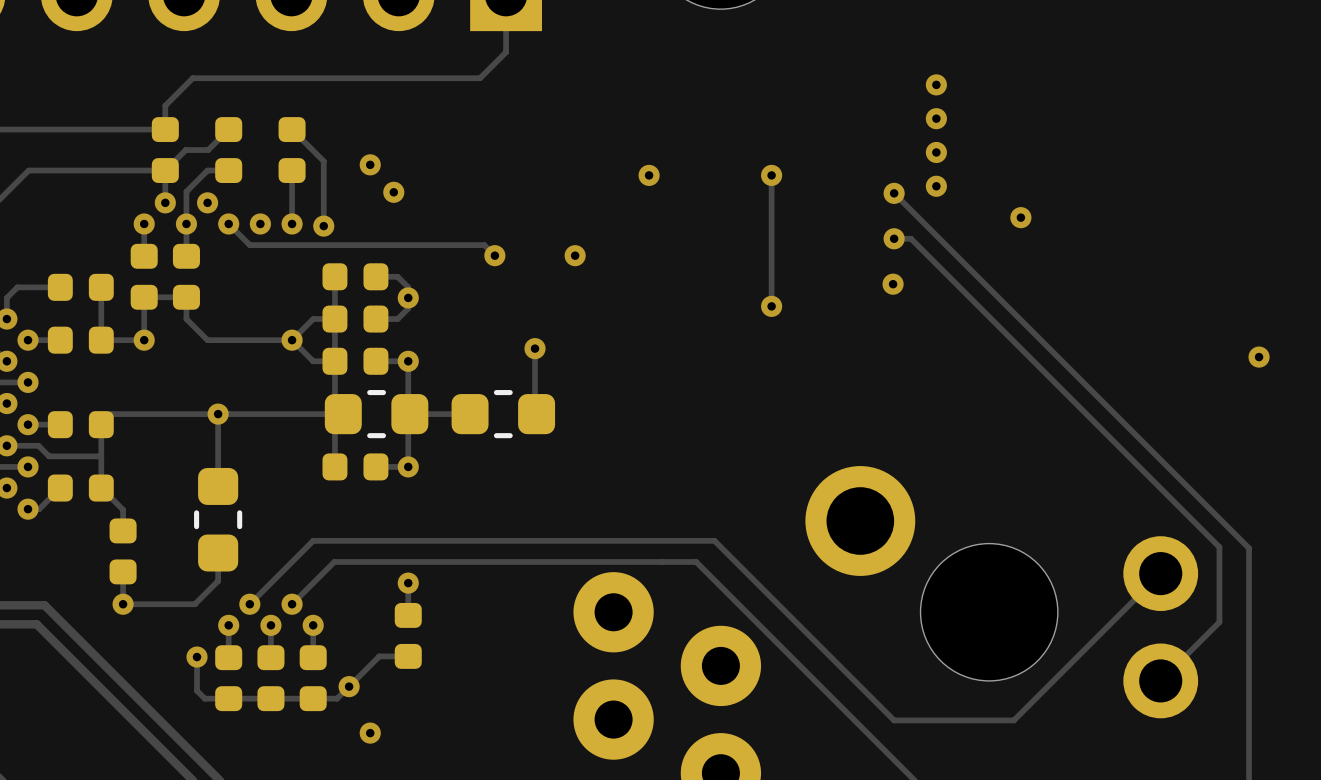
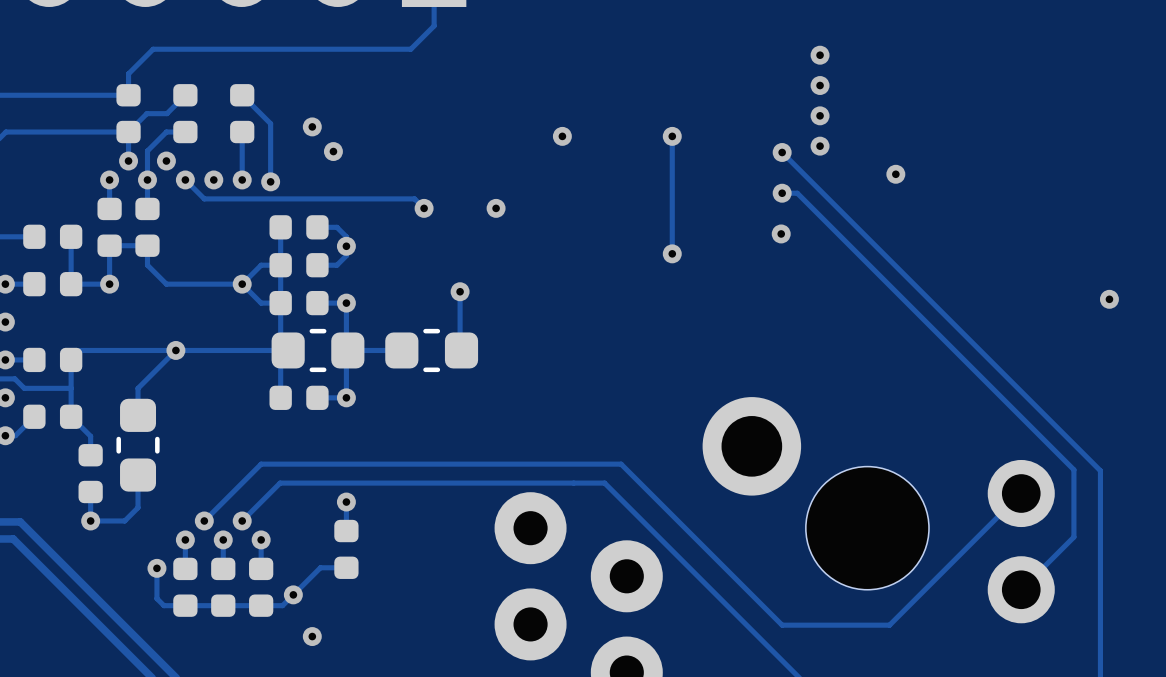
track: (218, 414) (218, 486) -> (175, 350) (138, 388) (138, 415)
part position: (218, 519) -> (138, 445)
track: (218, 553) (218, 580) (194, 604) (161, 604) -> (138, 475) (138, 507) (124, 520)

